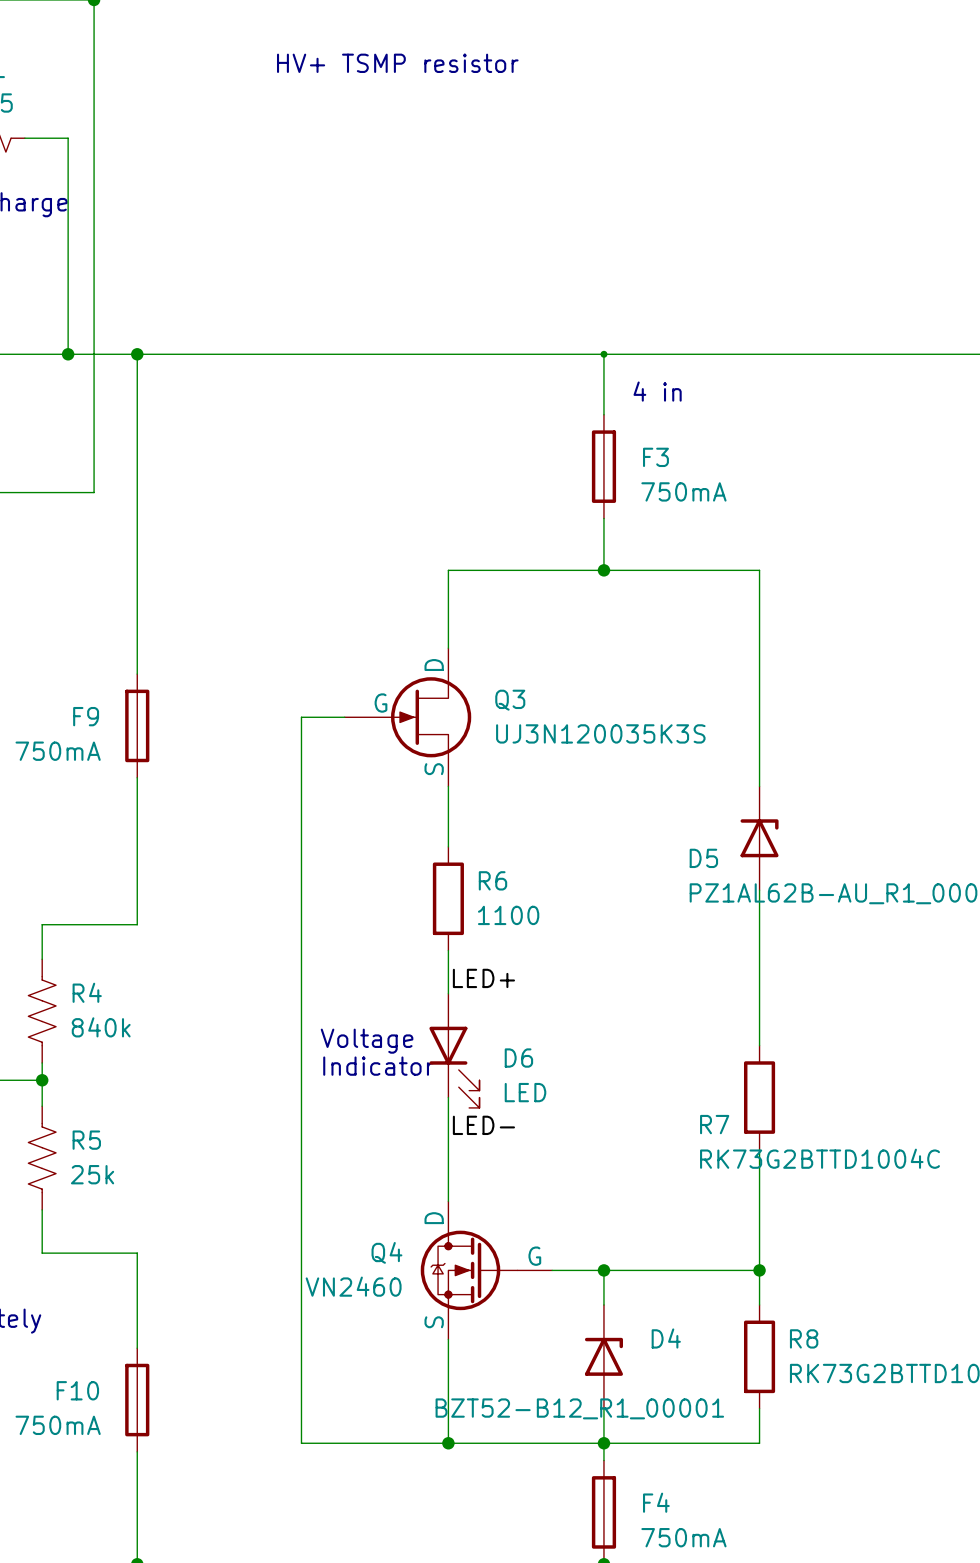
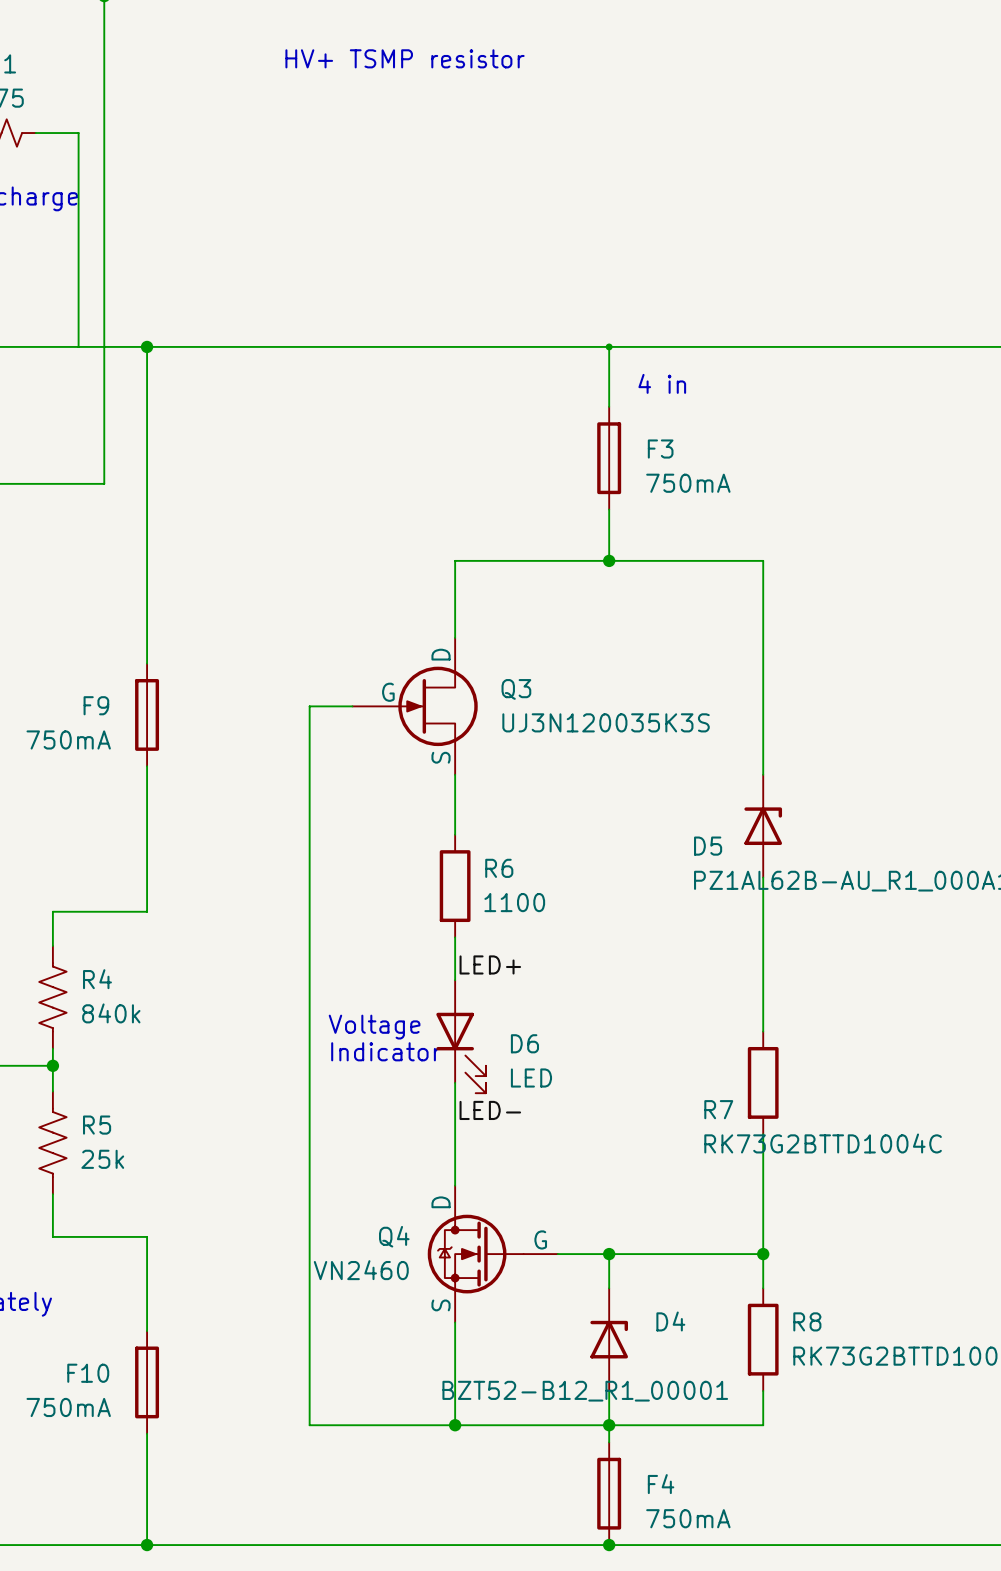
junction: (68, 354) -> none

